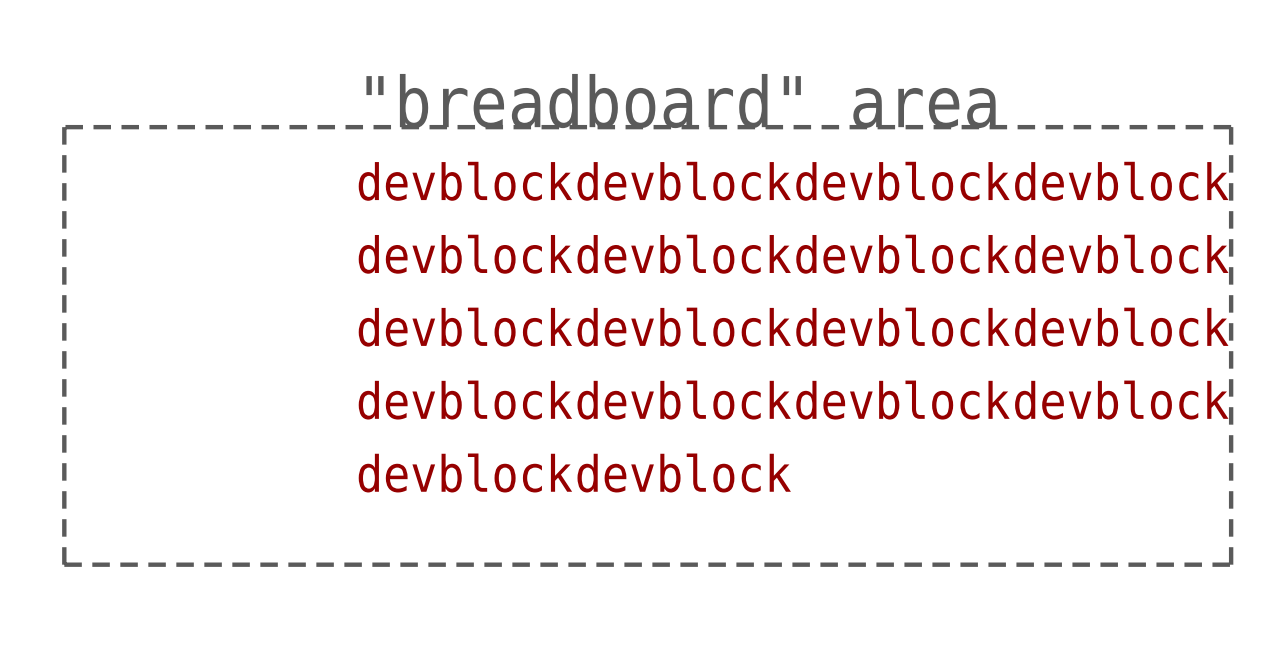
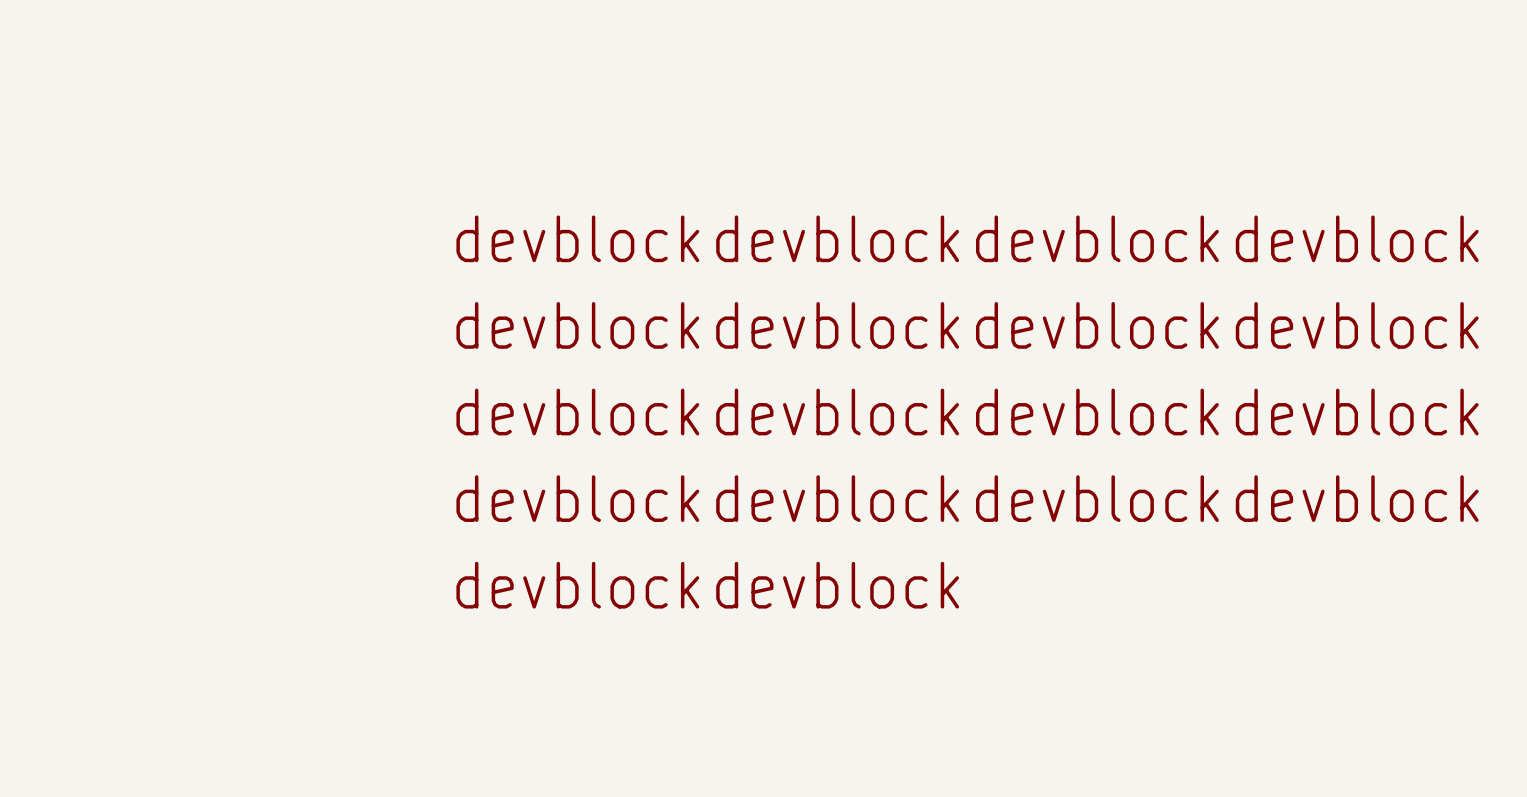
text: "breadboard" area (681, 101) -> none
line: (64, 127) (64, 564) (1231, 564) (1231, 127) (64, 127) -> none

